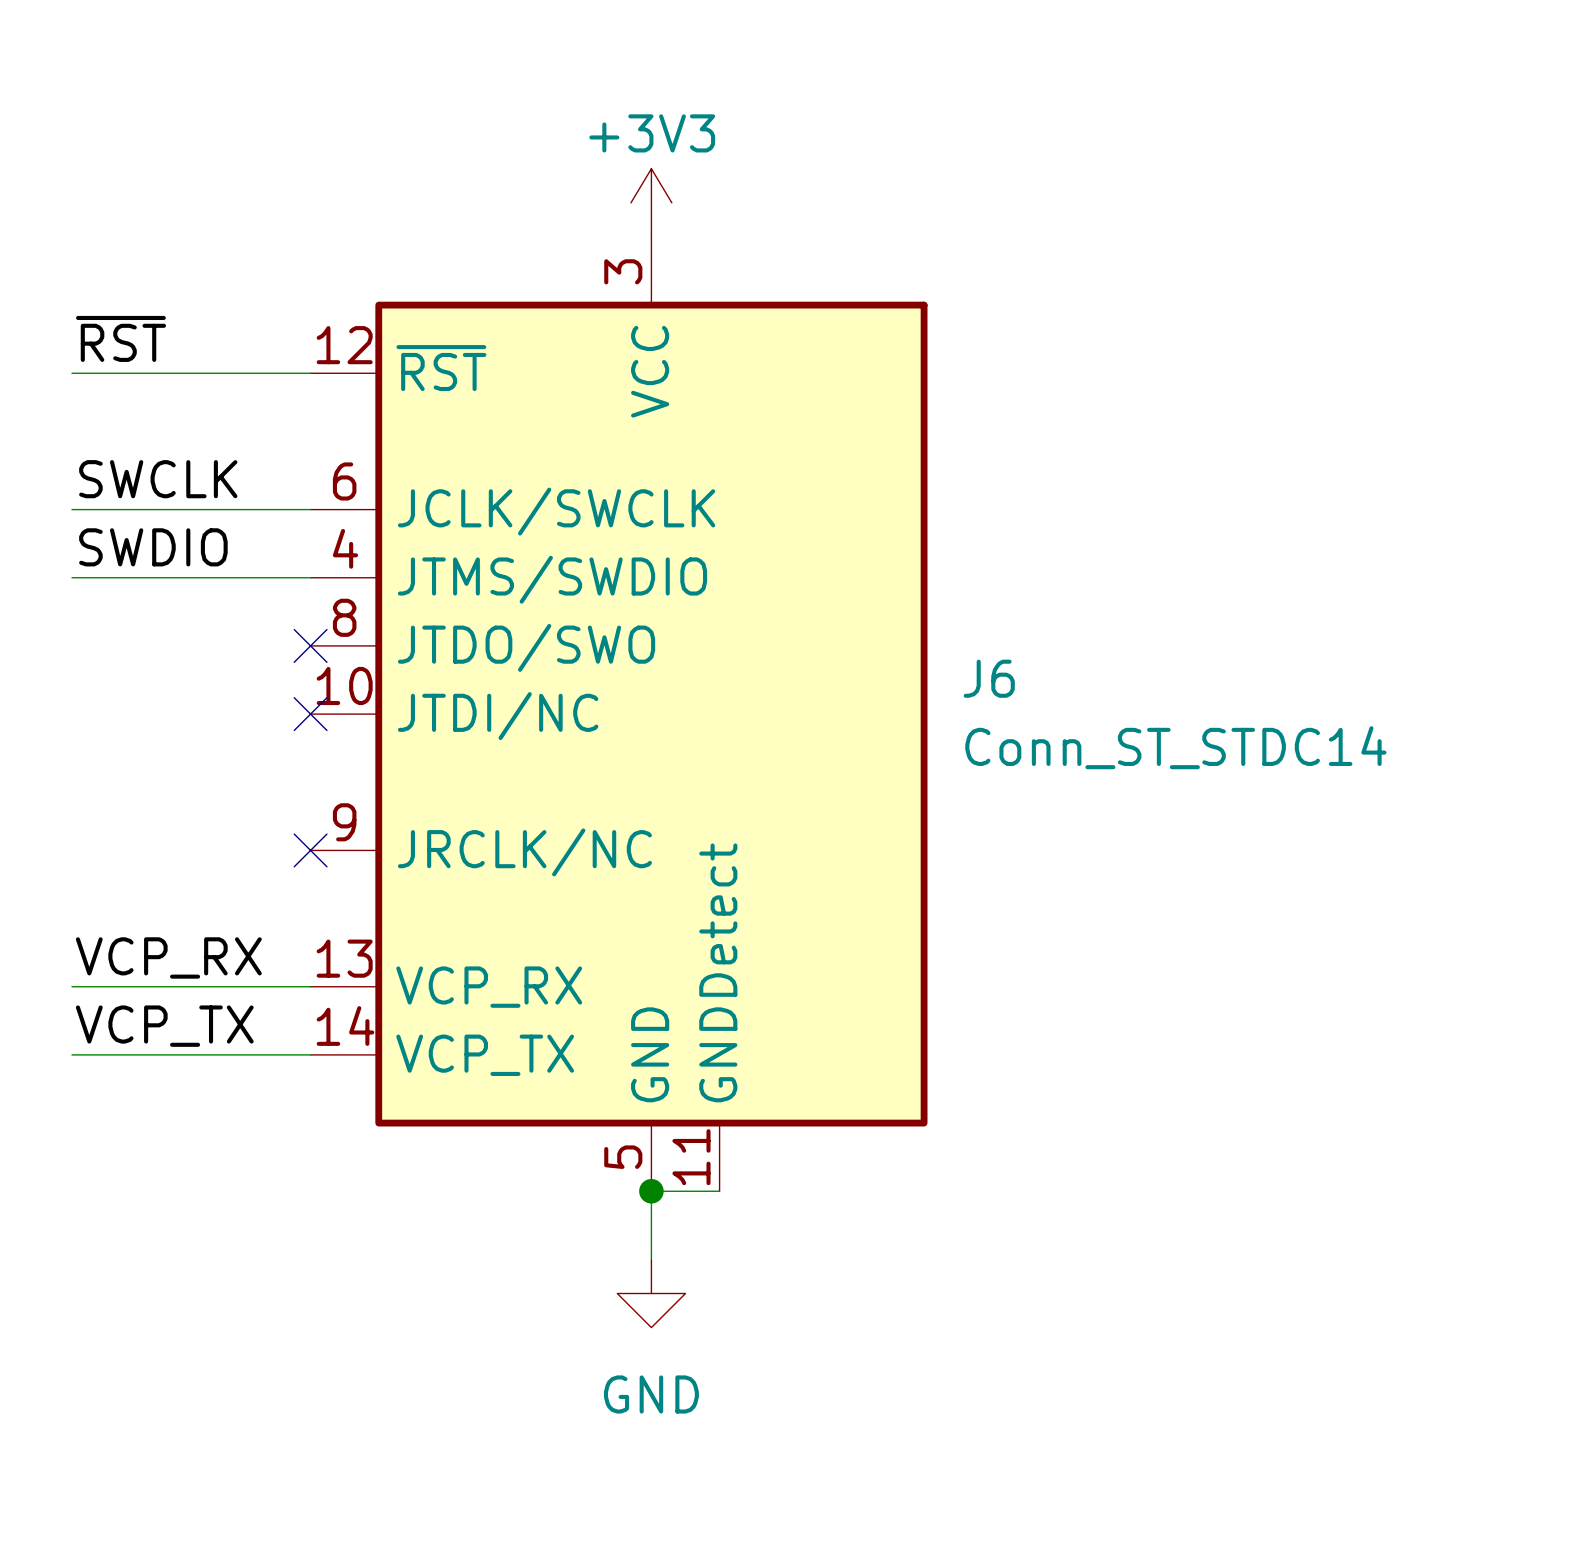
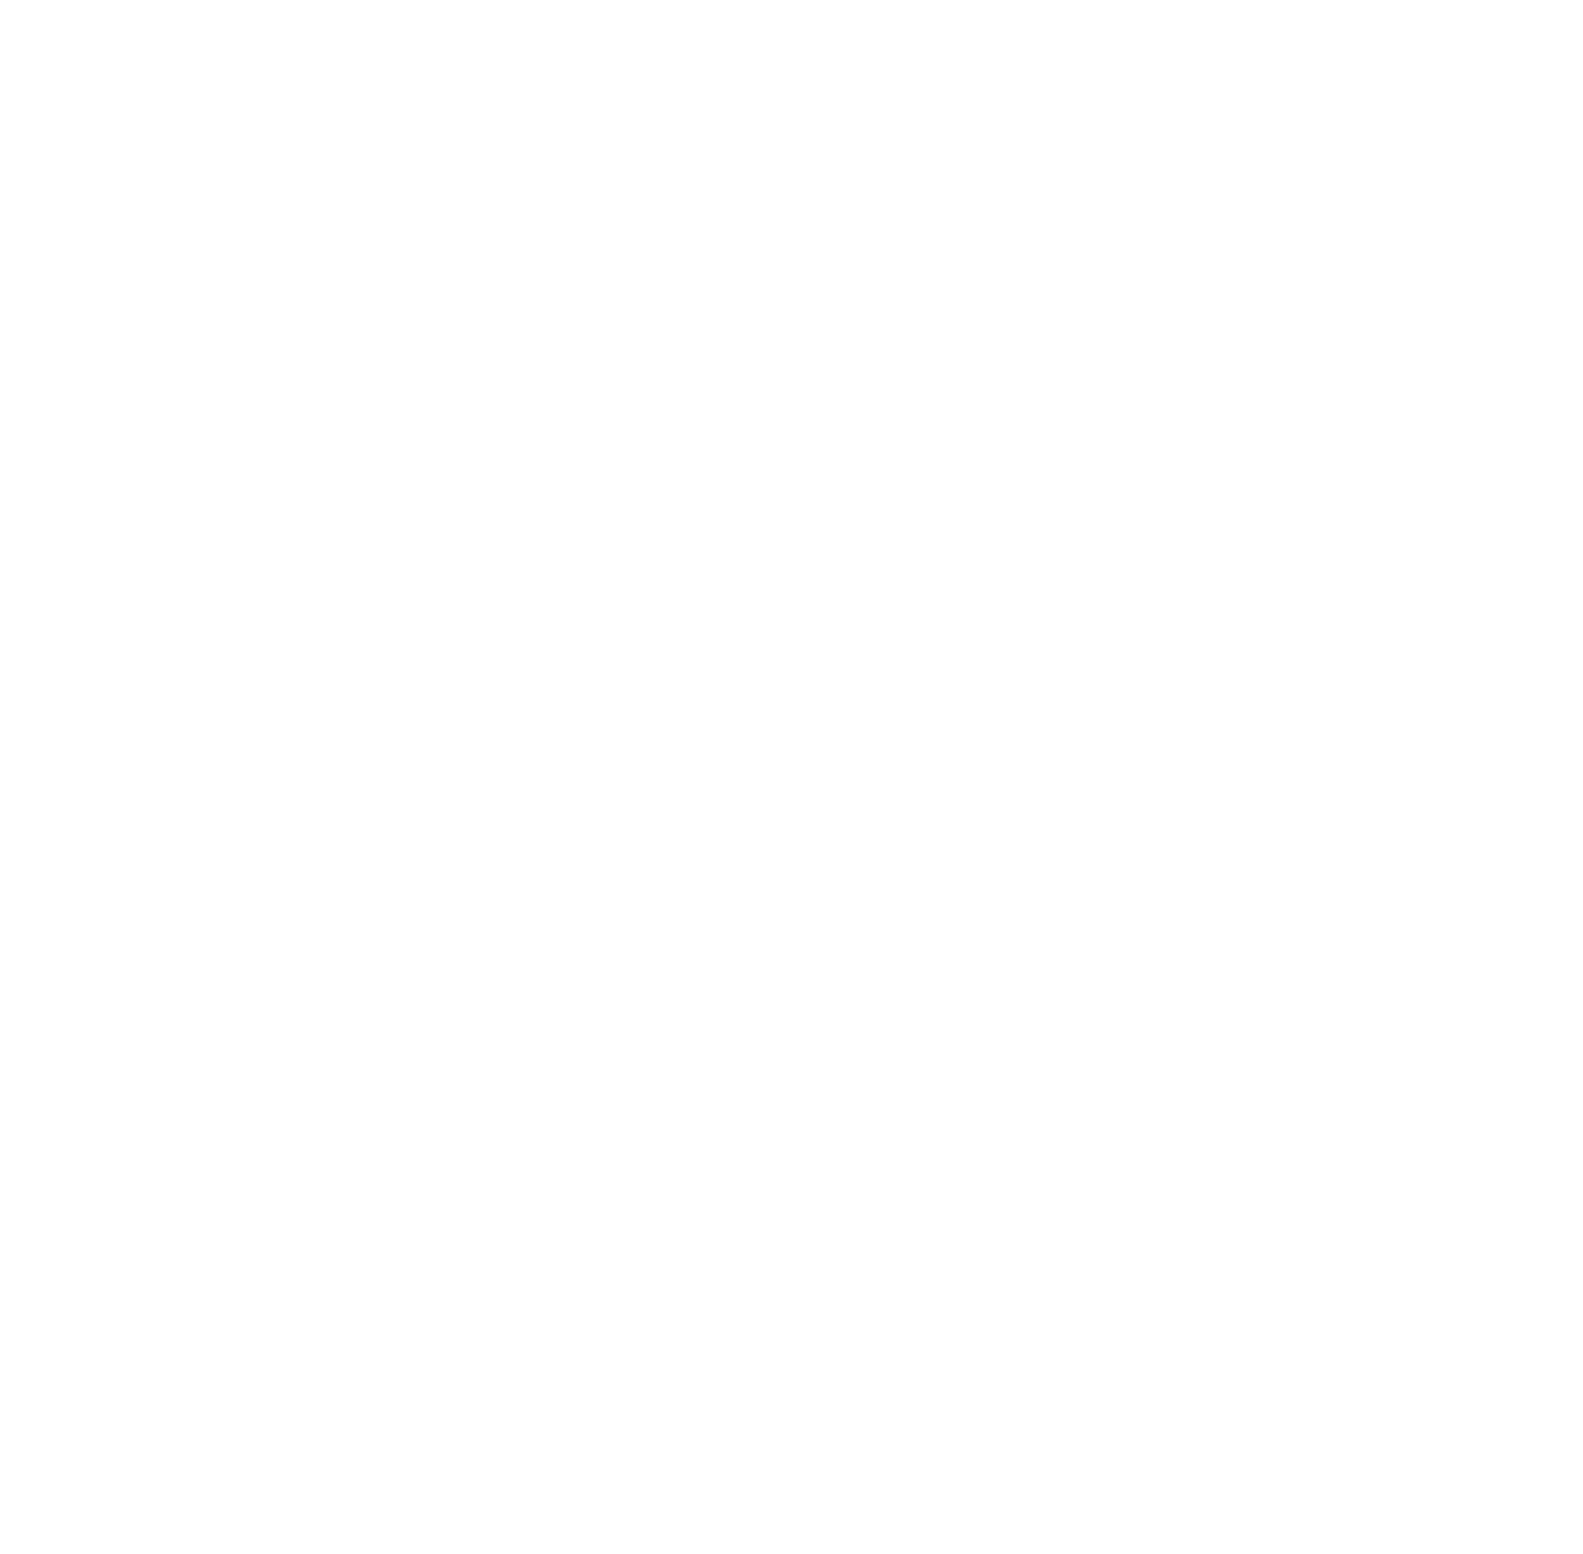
power symbol: +3V3 (651, 202) -> none
label: ~{RST} (121, 338) -> none
wire: (72, 373) (310, 373) -> none
label: SWCLK (158, 479) -> none
wire: (72, 509) (310, 509) -> none
label: SWDIO (153, 547) -> none
wire: (72, 577) (310, 577) -> none
no-connect mark: (310, 645) -> none
no-connect mark: (310, 714) -> none
J6: Conn_ST_STDC14 (619, 714) -> none
no-connect mark: (310, 850) -> none
label: VCP_RX (168, 957) -> none
wire: (72, 986) (310, 986) -> none
label: VCP_TX (164, 1026) -> none
wire: (72, 1054) (310, 1054) -> none
junction: (651, 1191) -> none
wire: (719, 1191) (651, 1191) (651, 1259) -> none
power symbol: GND (651, 1293) -> none

